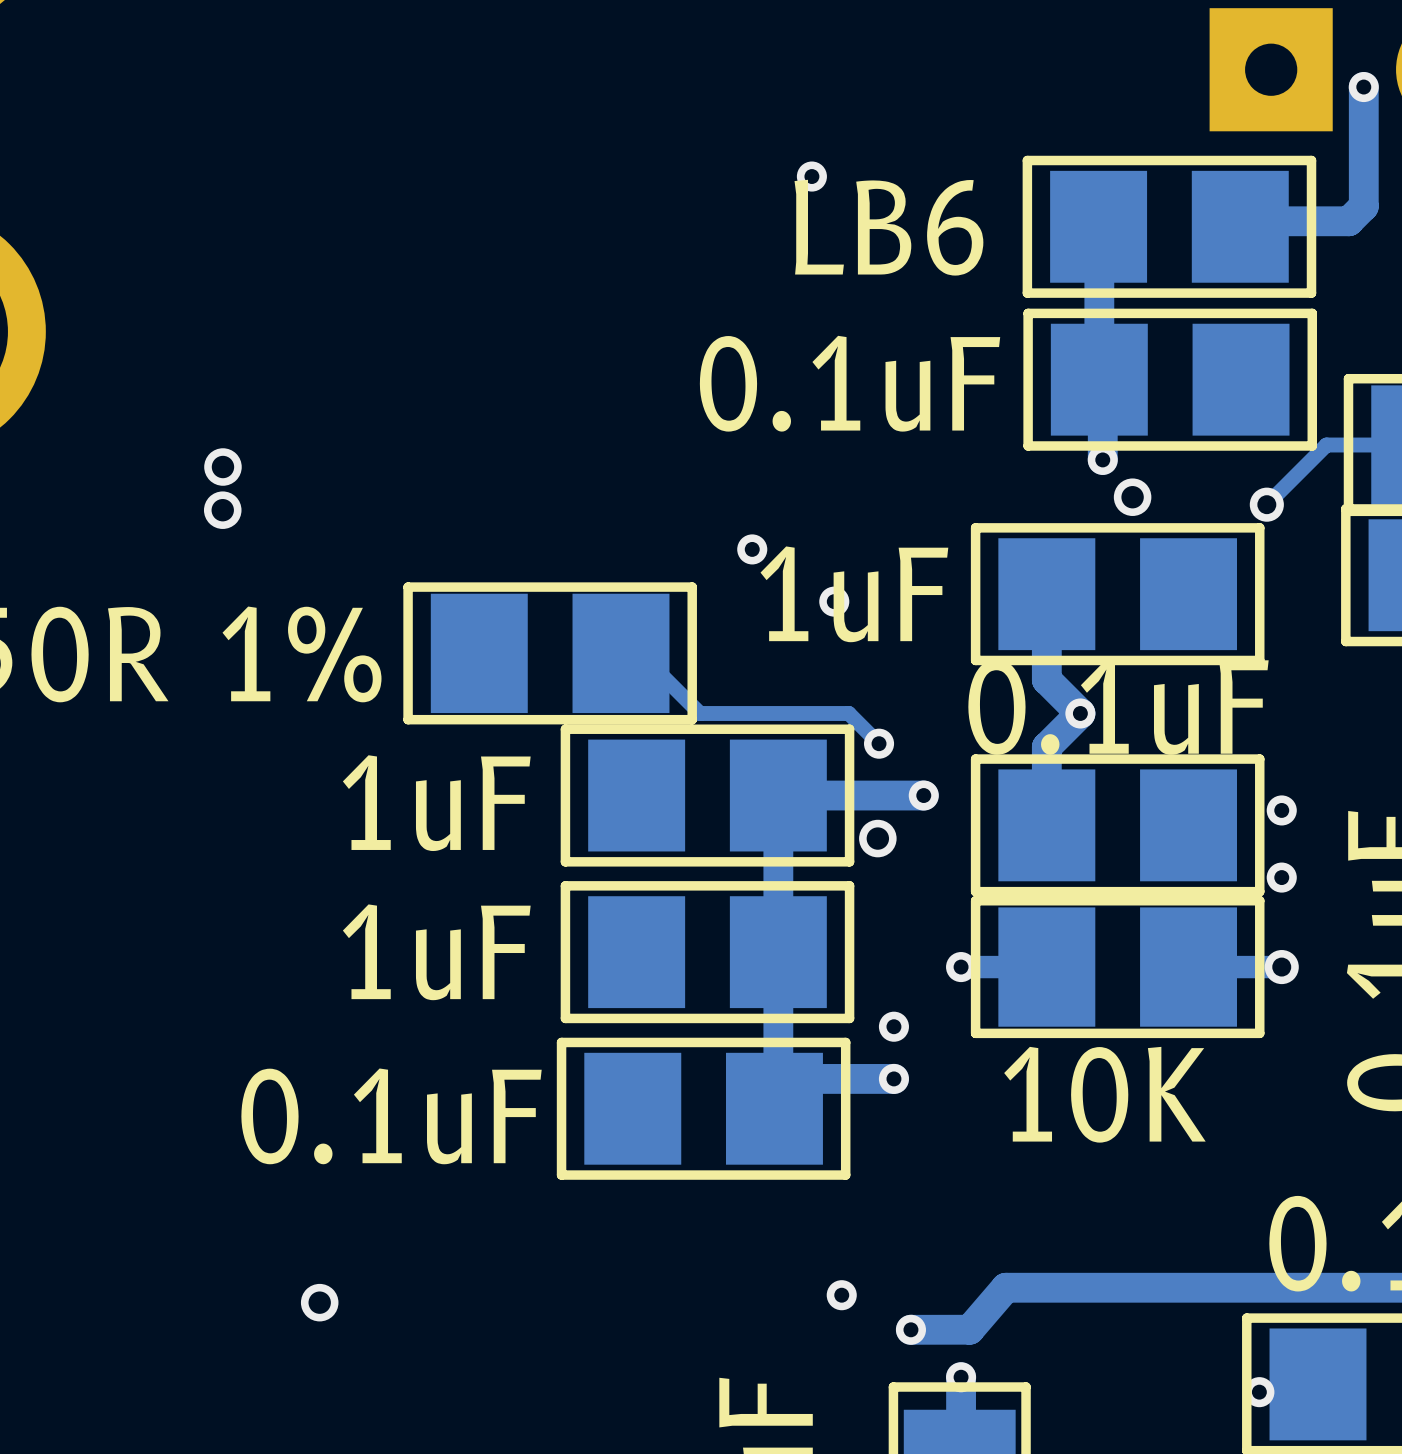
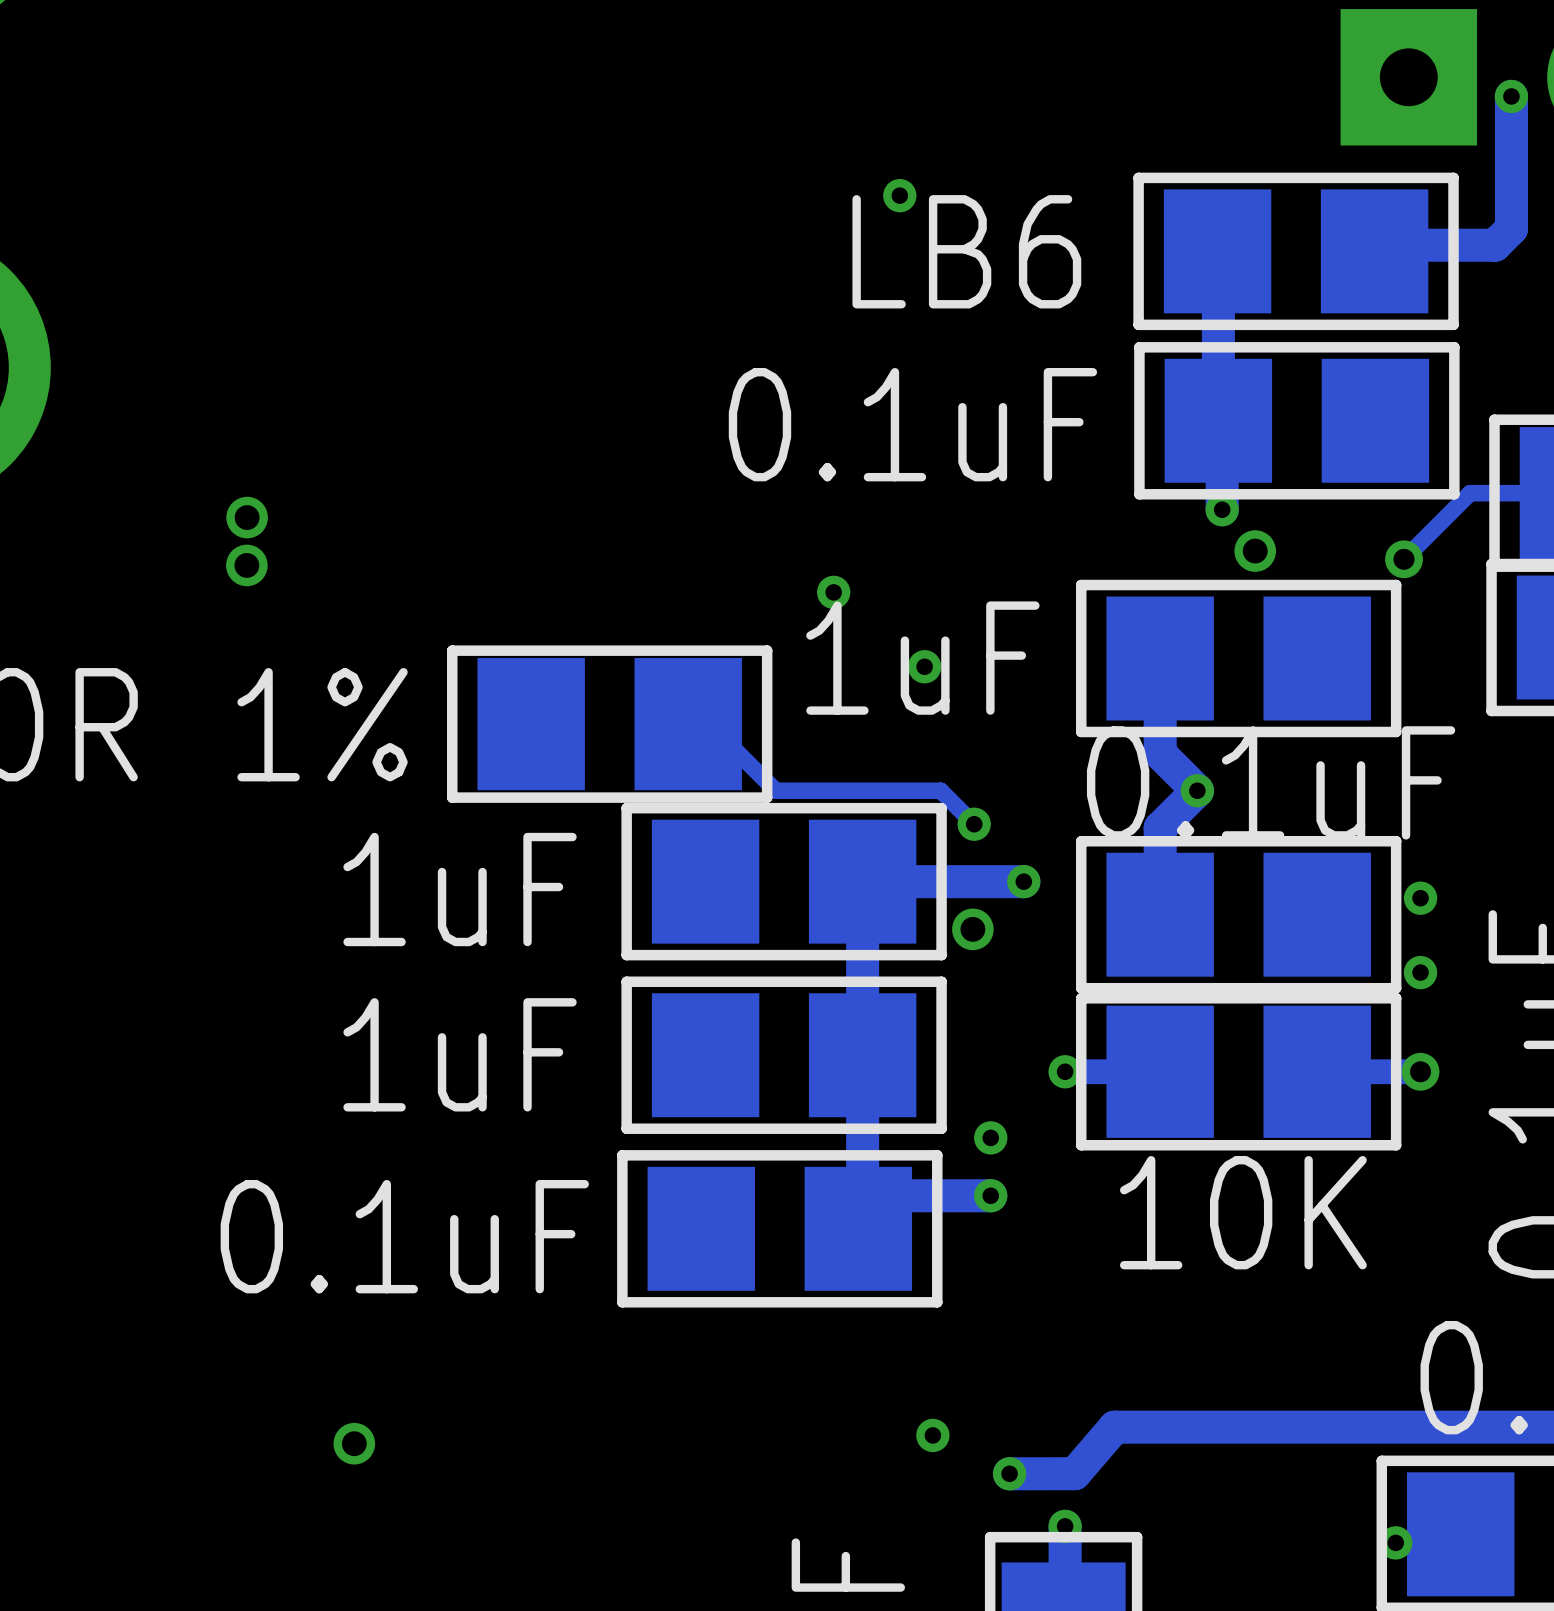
via position: (752, 549) -> (833, 592)

